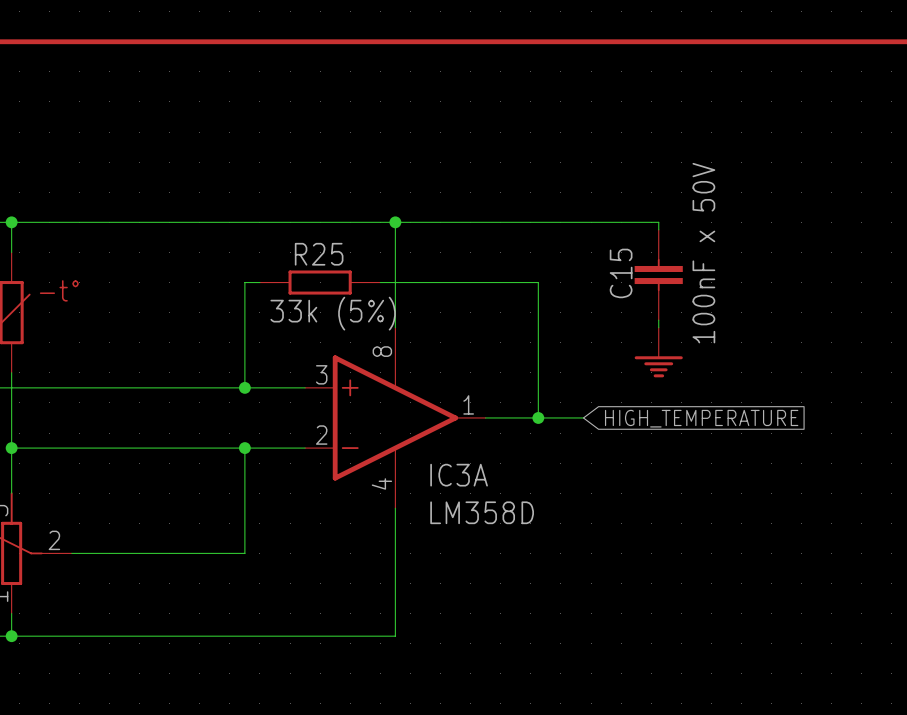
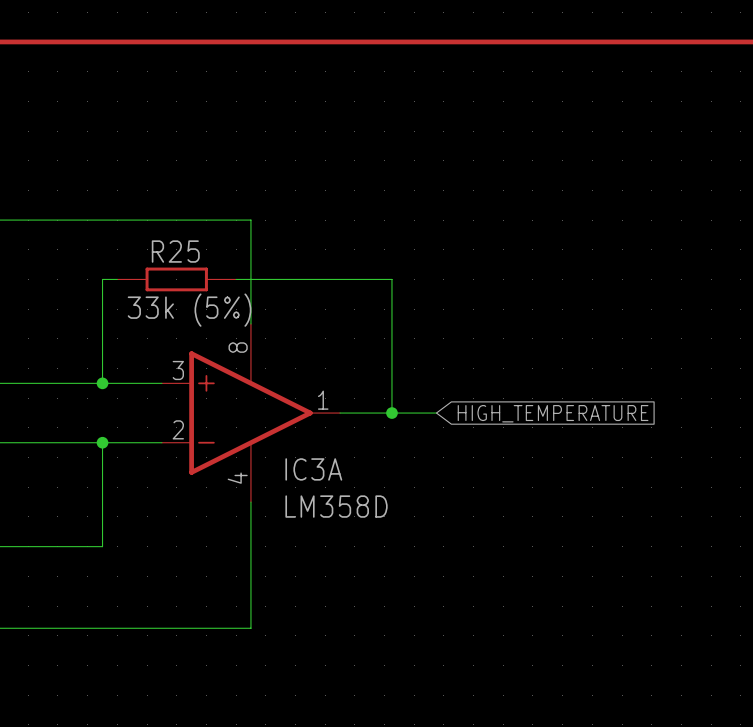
wire: (395, 222) (658, 222) (658, 229) -> none
junction: (395, 222) -> none
C15: 100nF x 50V (658, 275) -> none
wire: (658, 320) (658, 327) -> none
power symbol: (658, 352) -> none

